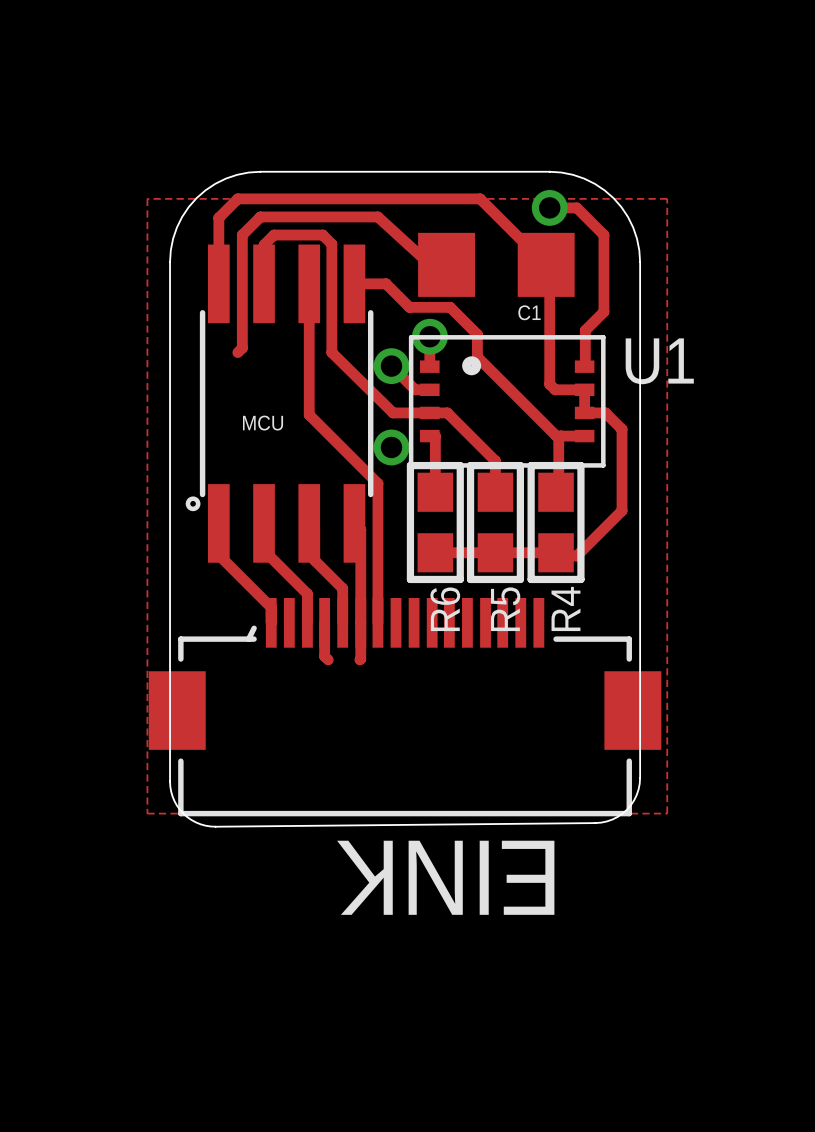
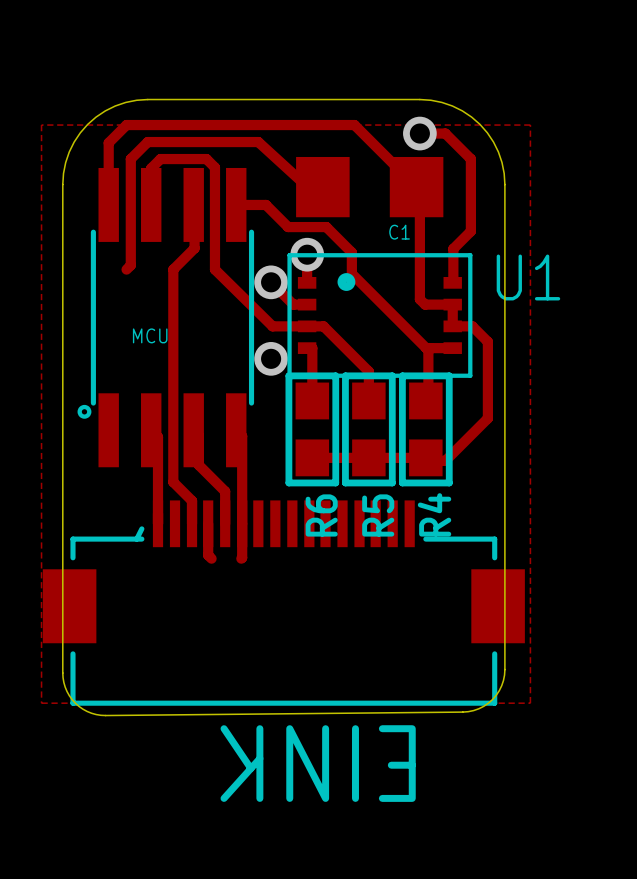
track: (309, 283) (309, 414) (377, 483) (377, 622) -> (193, 204) (194, 248) (173, 269) (173, 482) (192, 500)
track: (264, 524) (264, 551) (307, 593) (307, 598) -> (152, 431) (158, 437) (158, 509)
track: (219, 555) (271, 607) -> none

